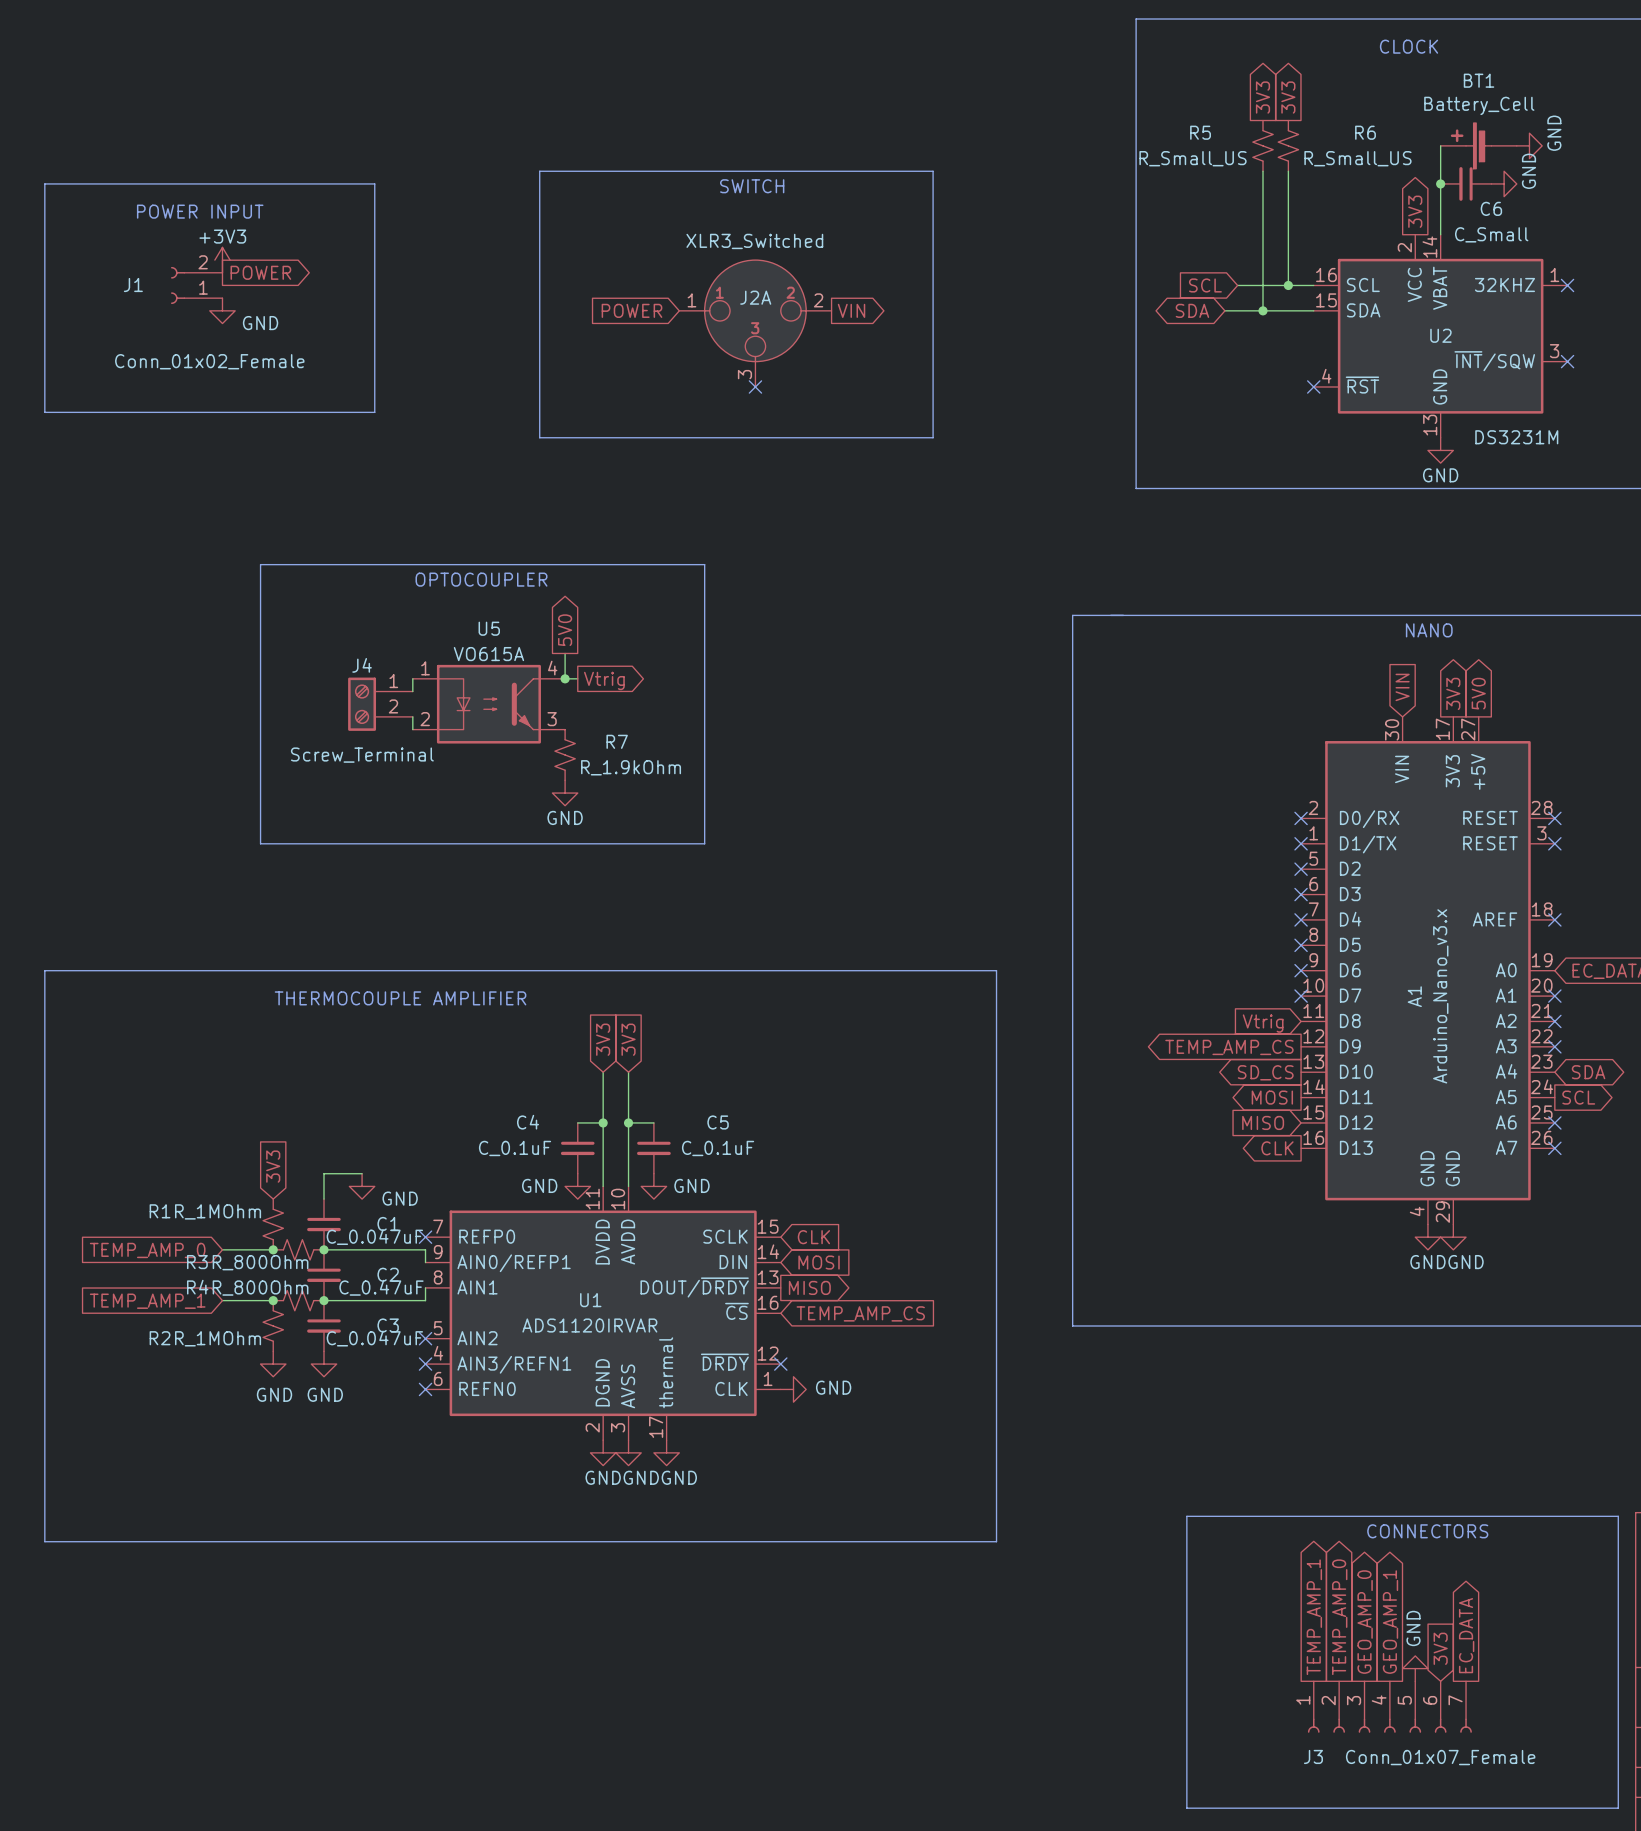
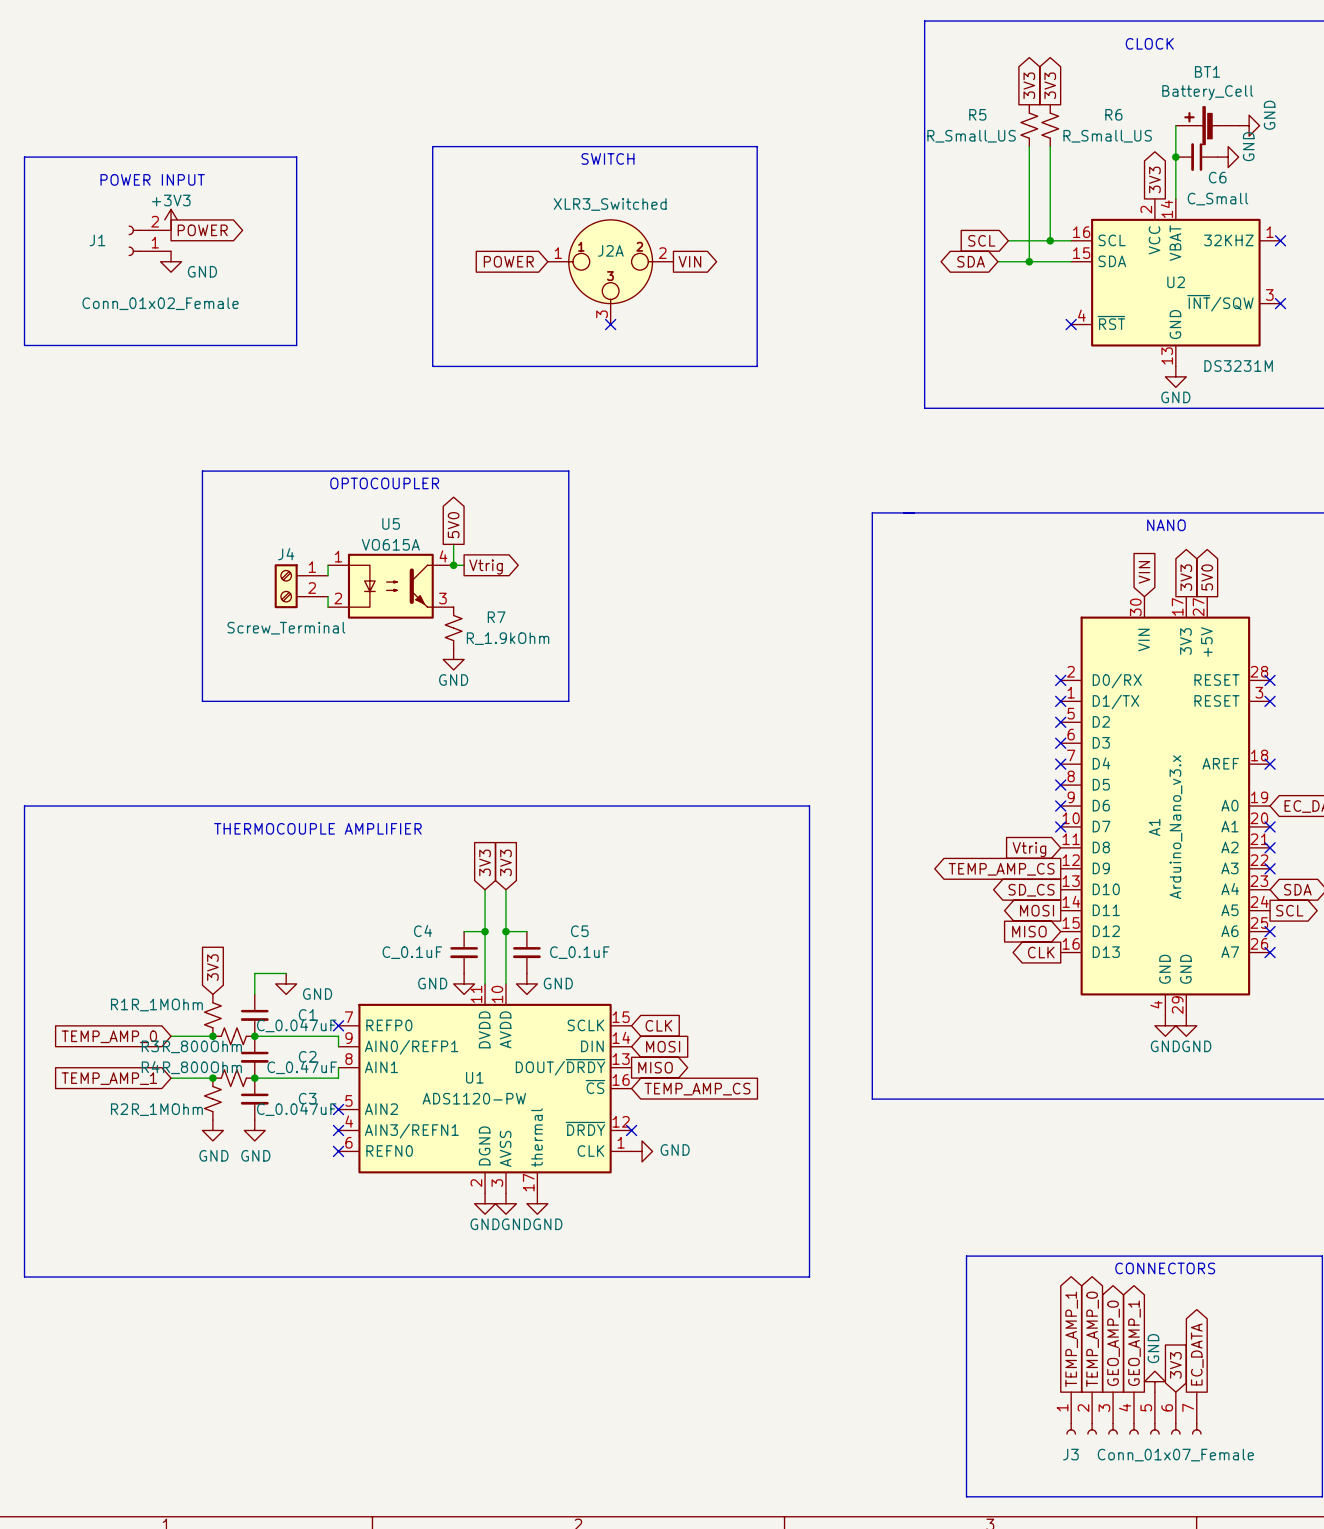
U1 value: ADS1120IRVAR (589, 1325) -> ADS1120-PW (474, 1098)

